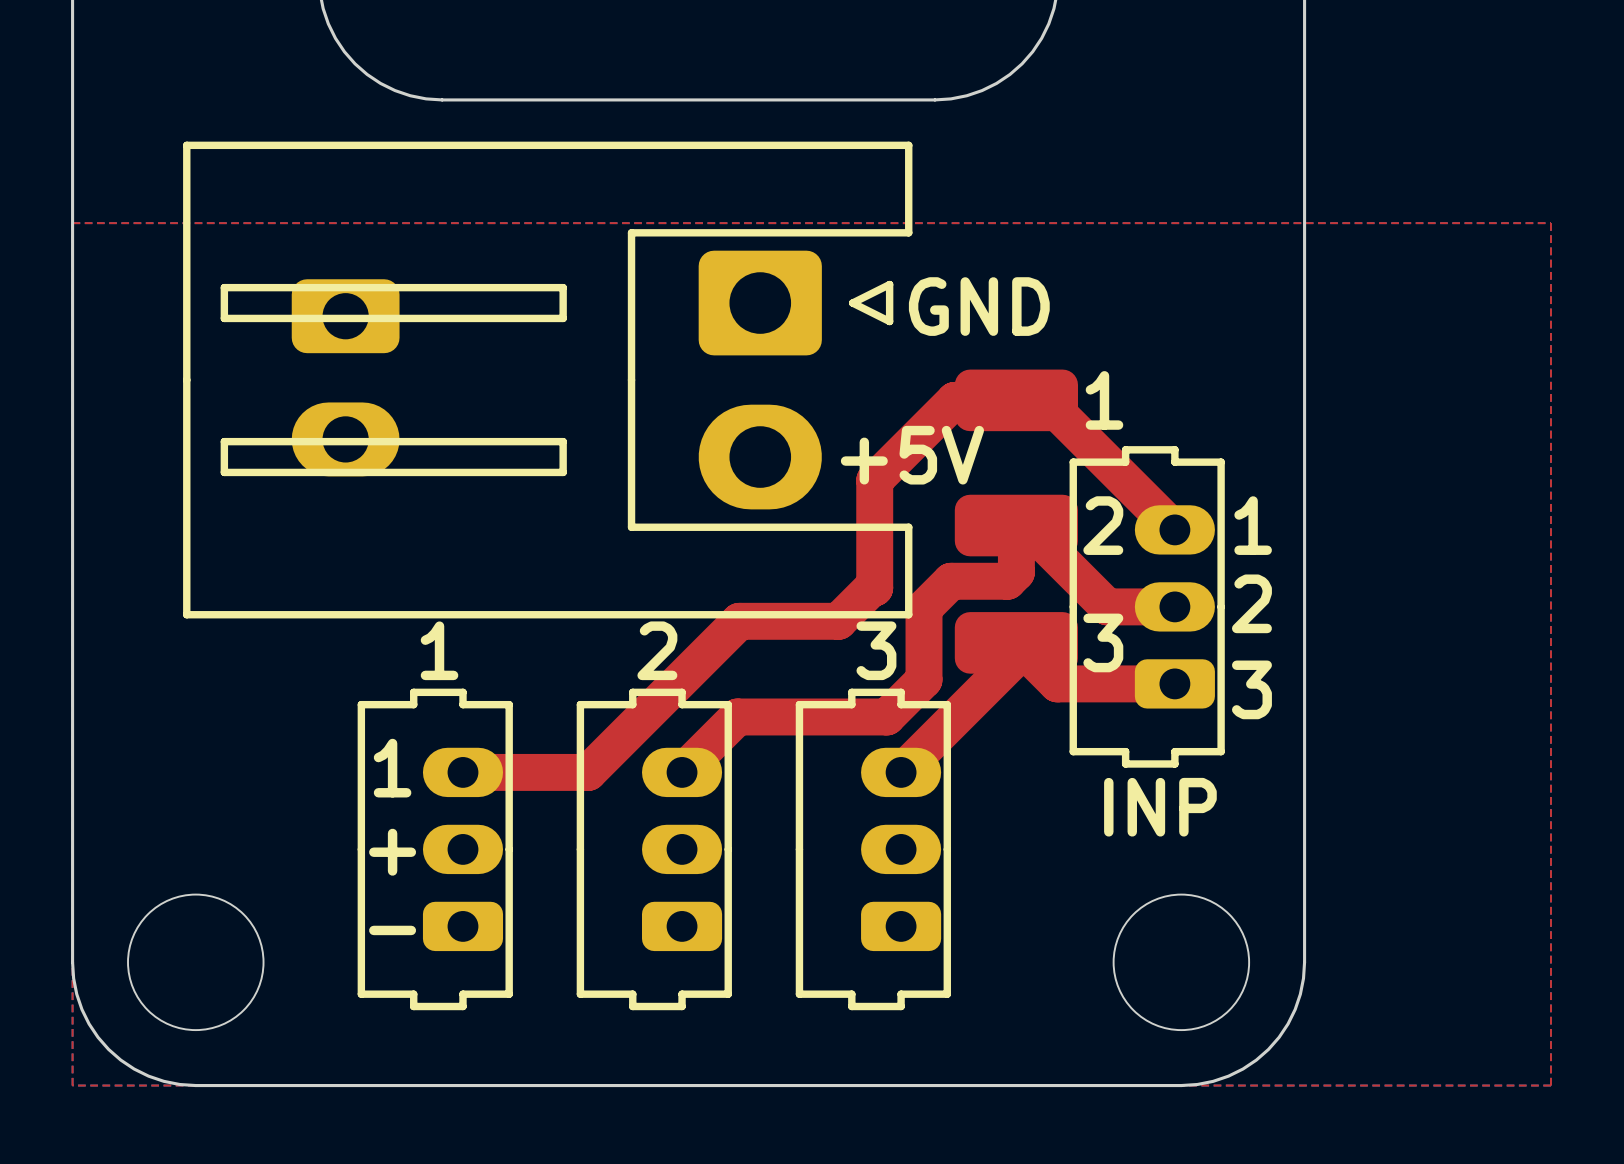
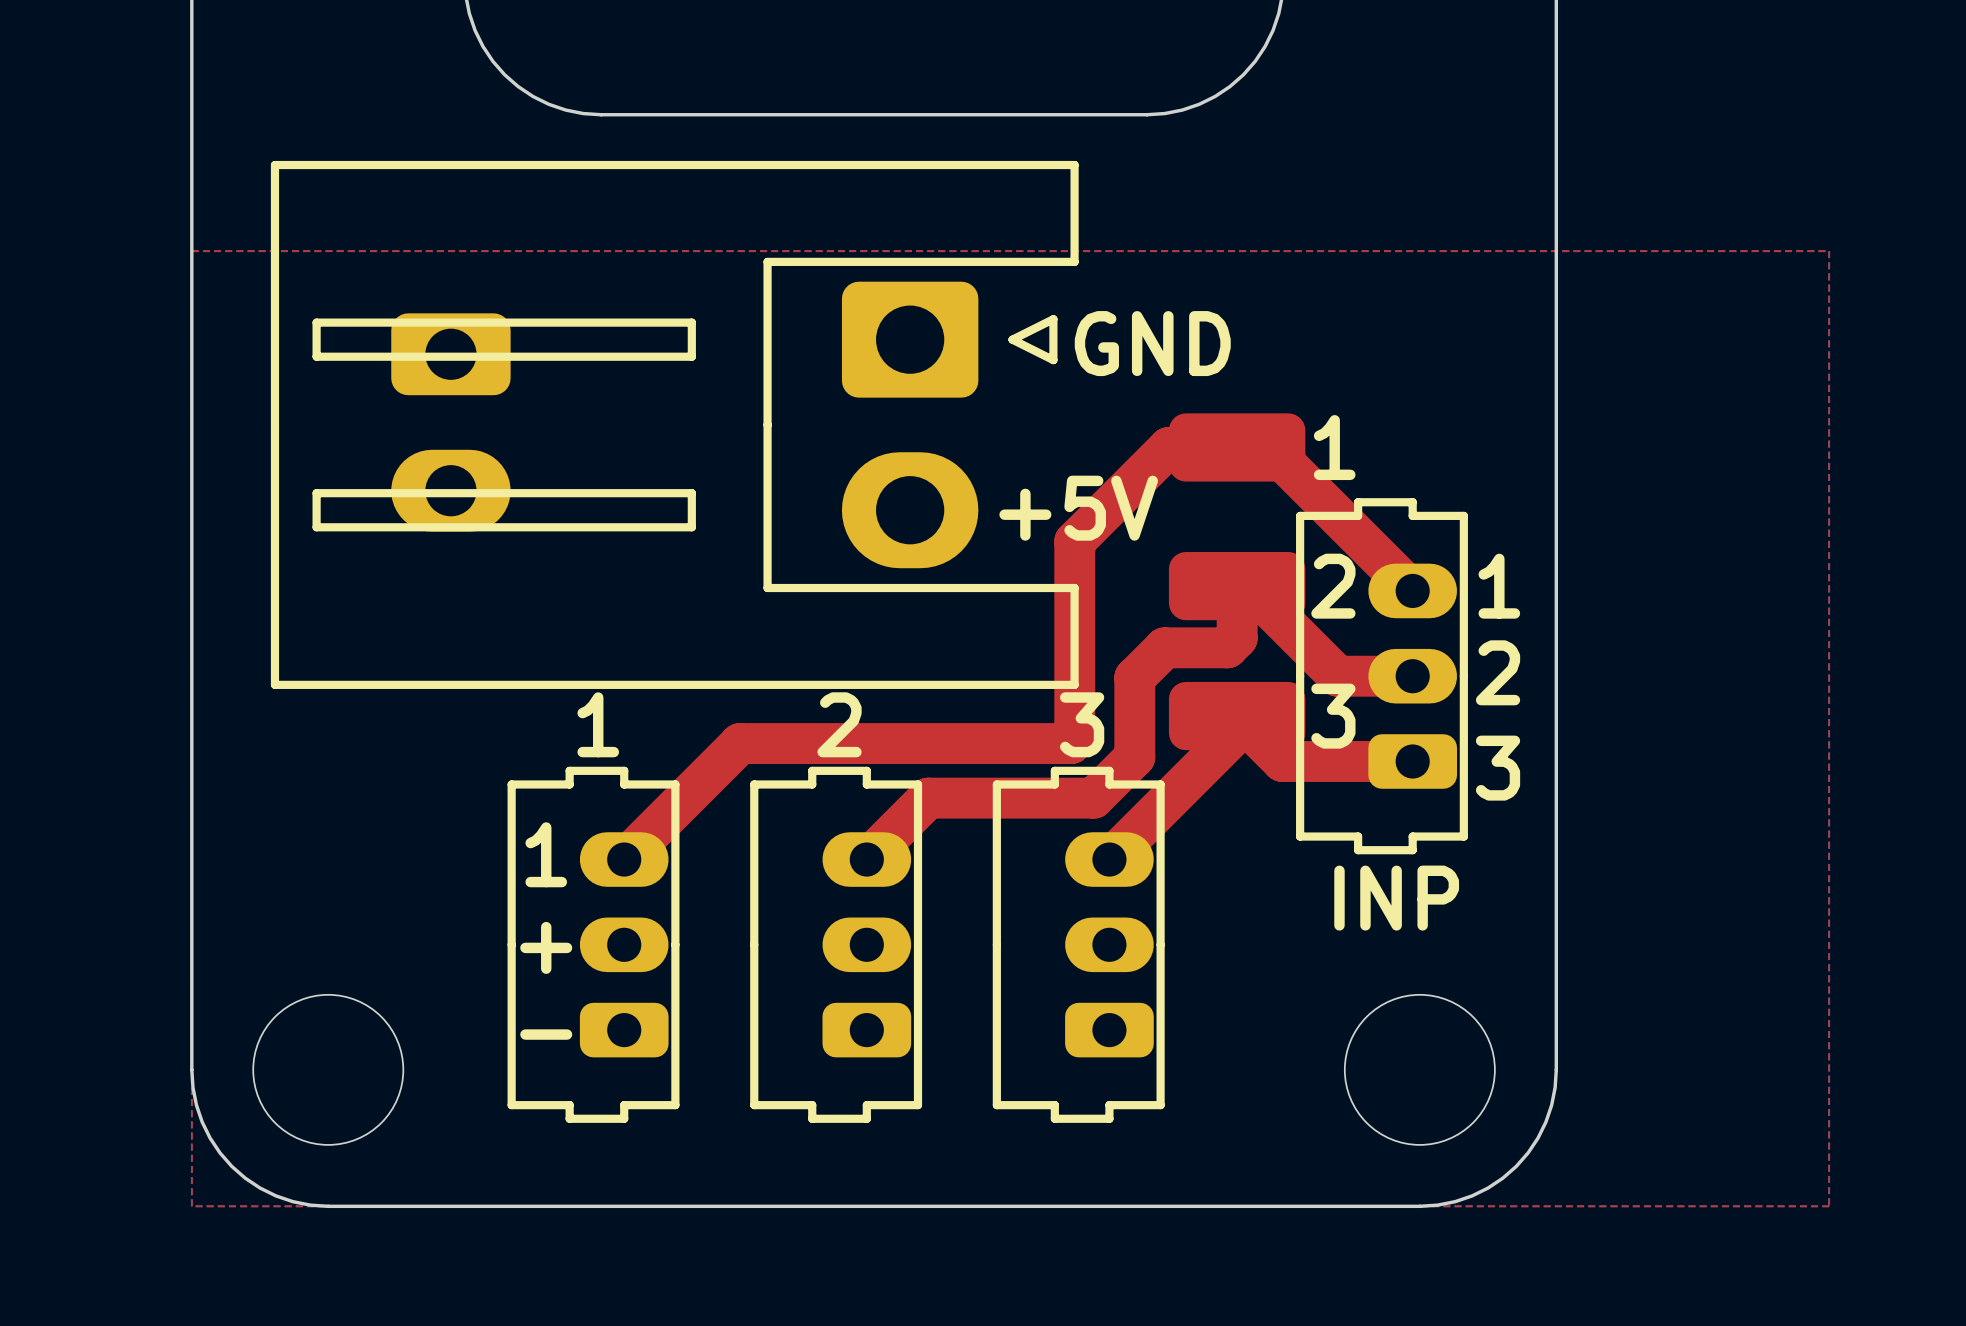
text position: GND (979, 306) -> GND (1152, 343)
part position: (345, 377) -> (450, 422)
part position: (547, 380) -> (674, 424)
text position: +5V (912, 455) -> +5V (1078, 508)
top track: (874, 480) (874, 587) (871, 587) (838, 621) (739, 621) (588, 772) (462, 772) -> (1080, 536) (1074, 541) (1074, 739) (1071, 743) (740, 743) (624, 859)

